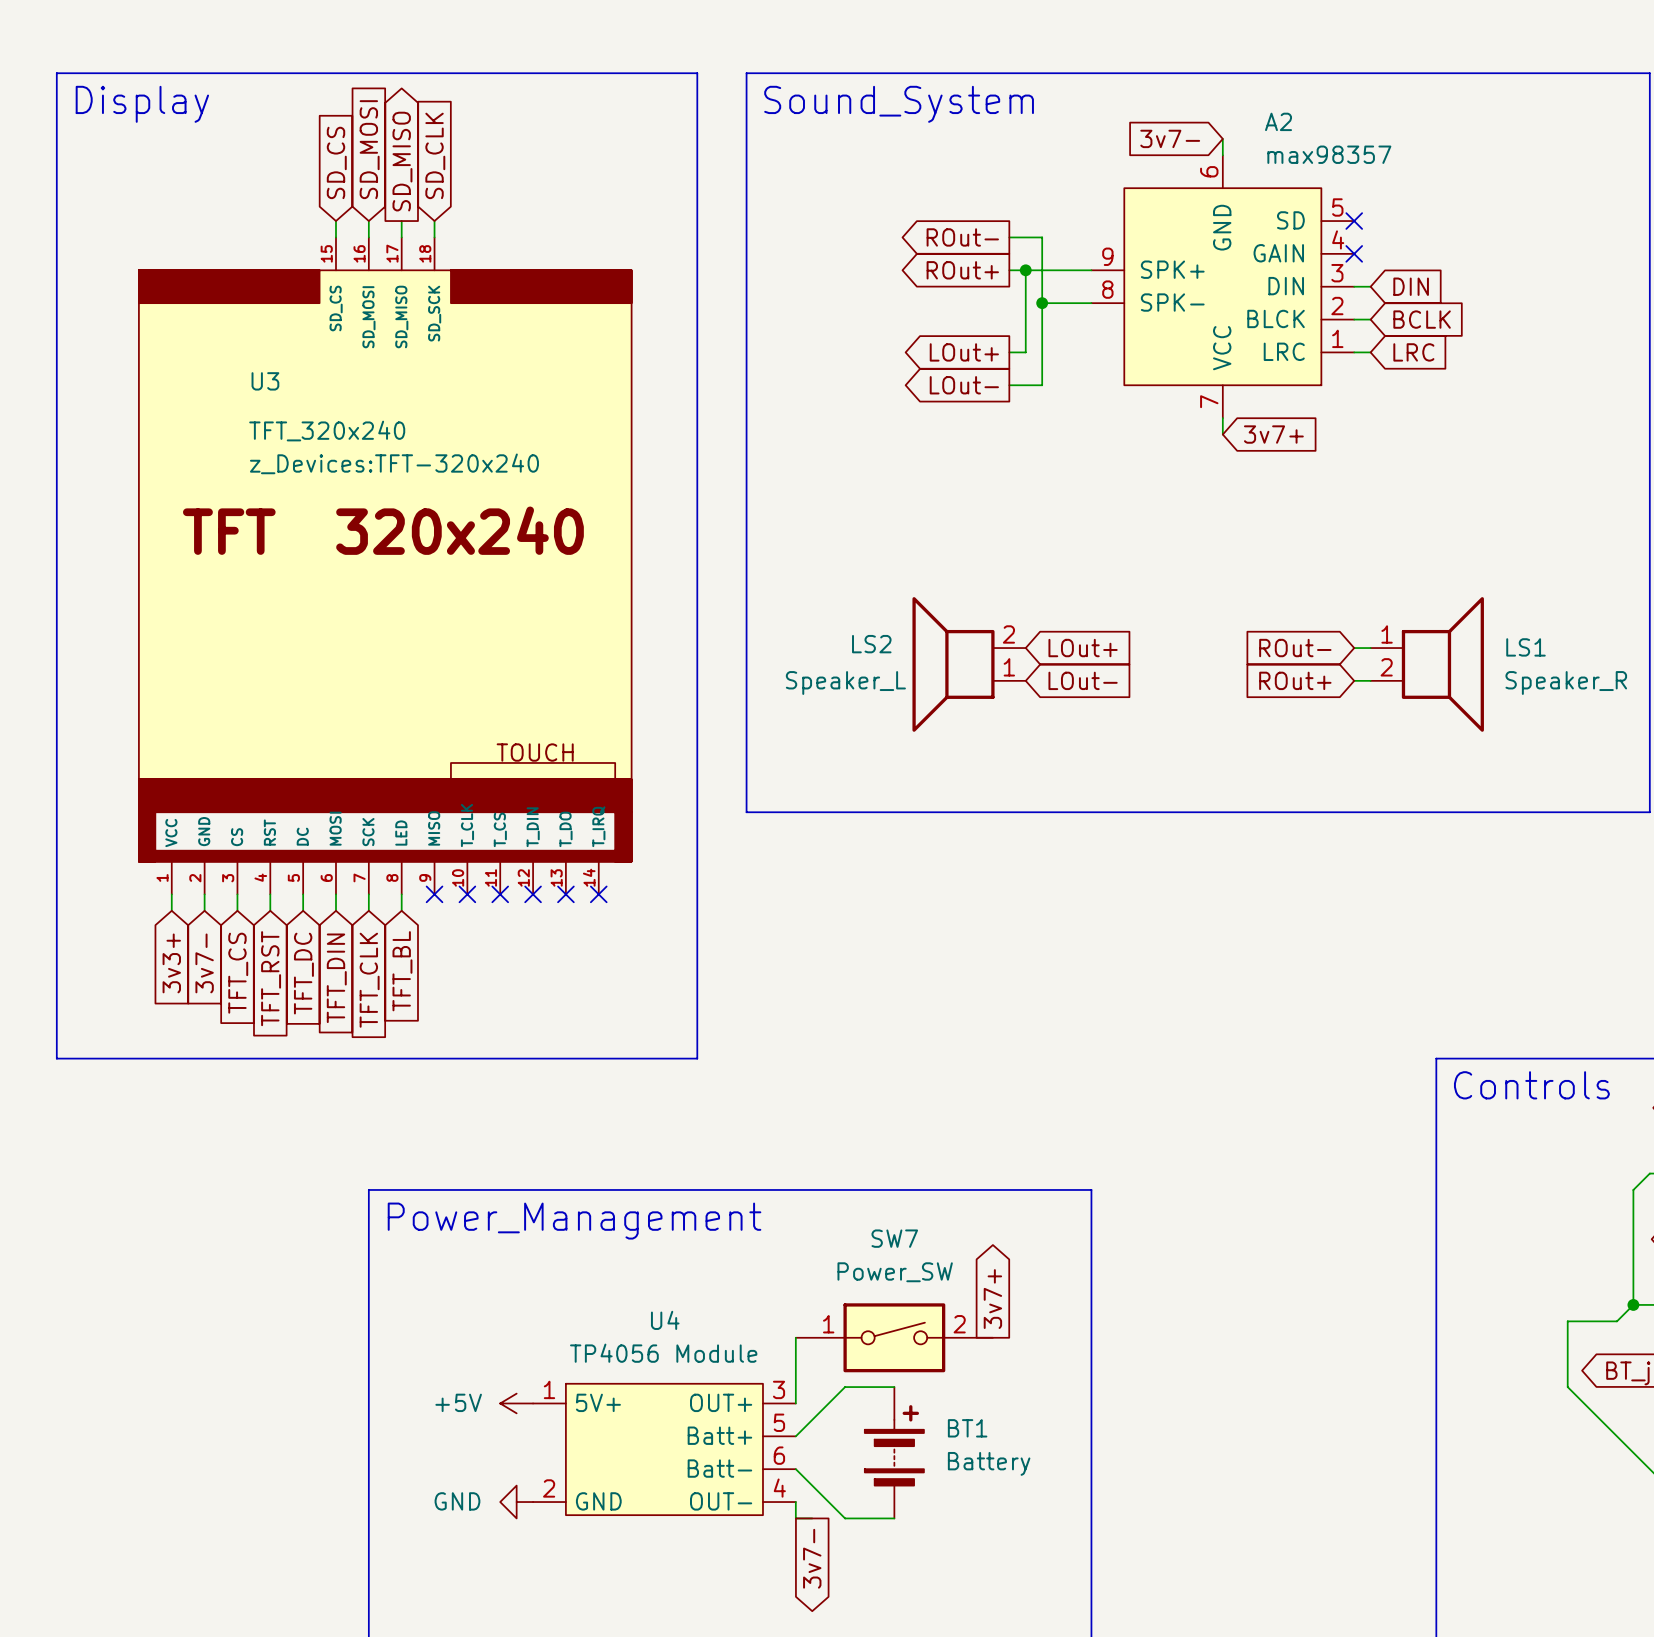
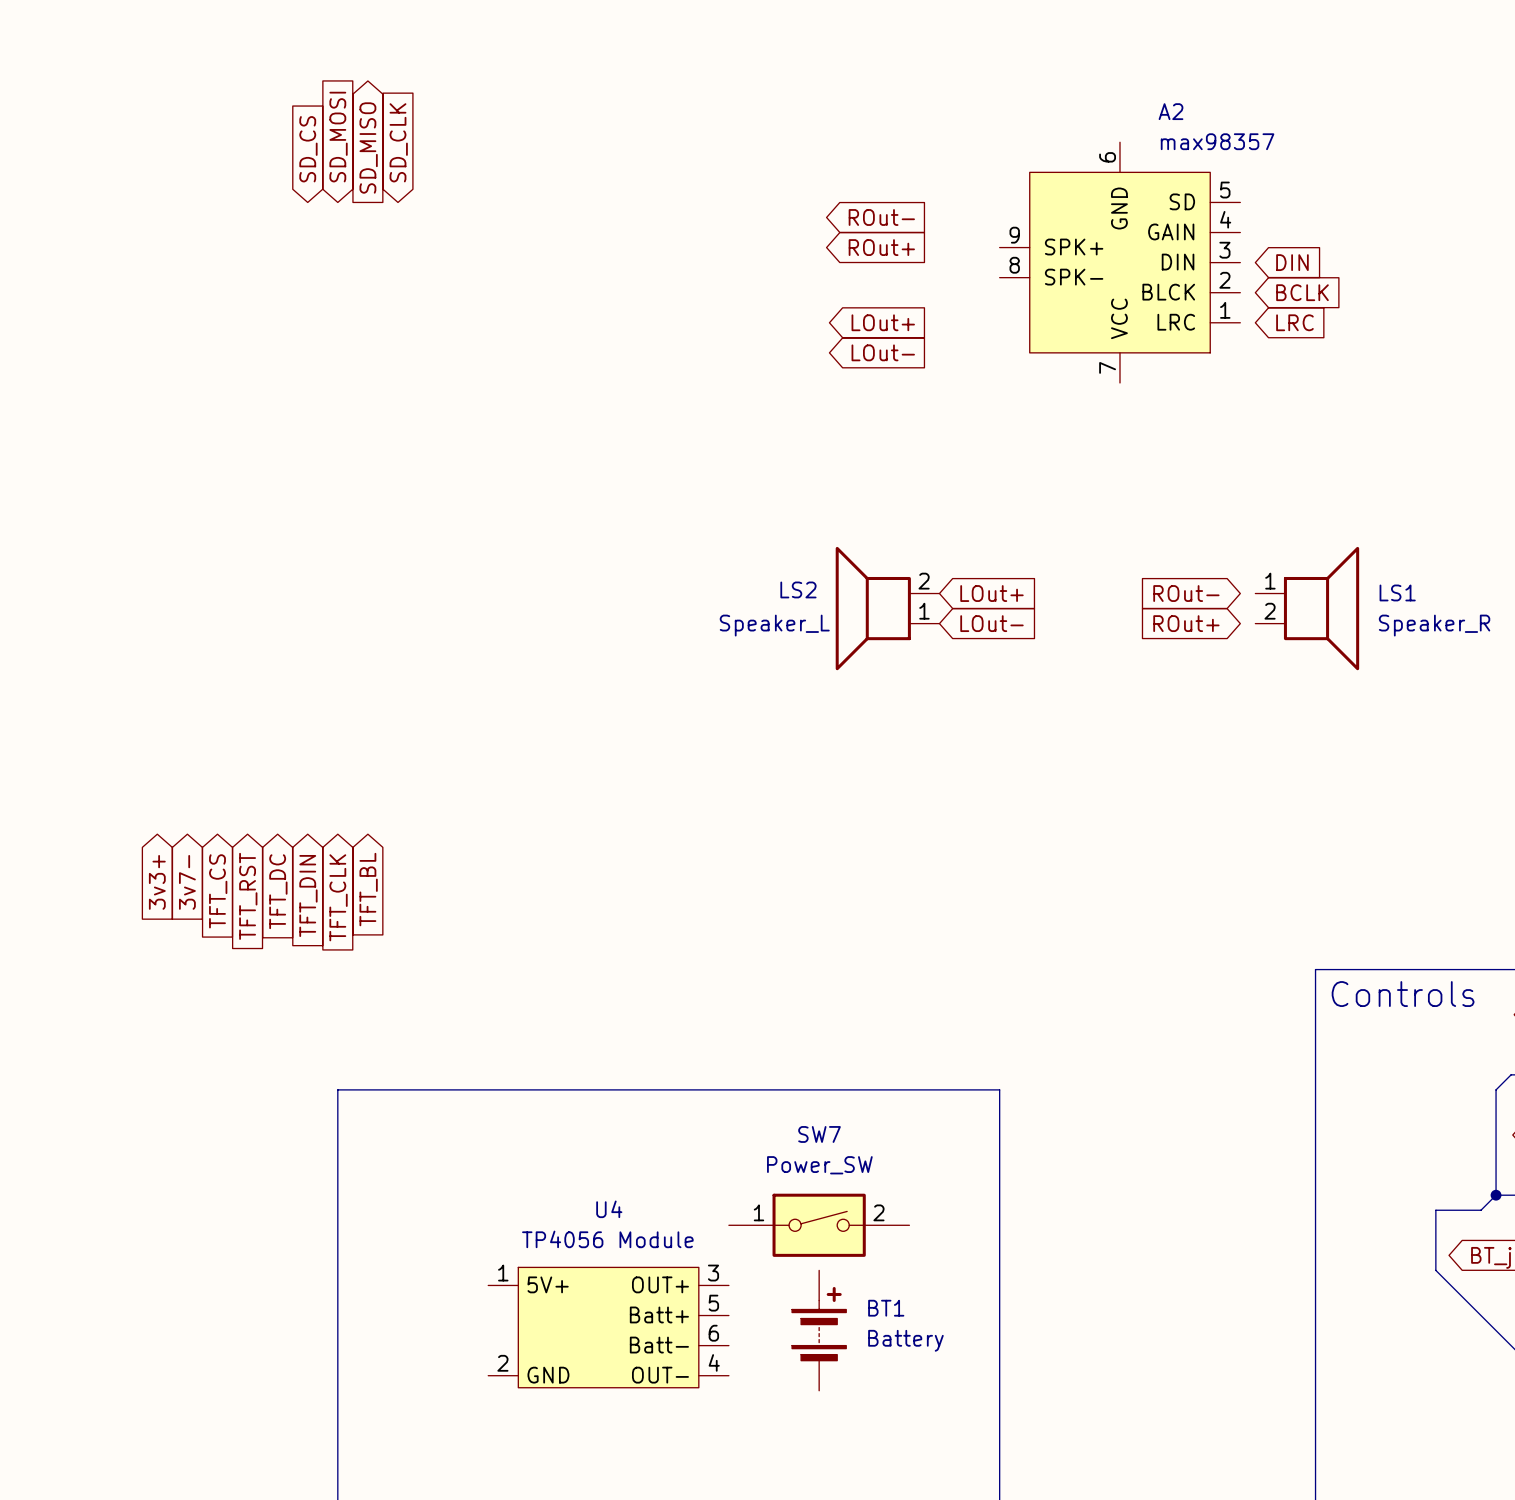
line: (56, 73) (697, 73) (697, 1058) (56, 1058) (56, 73) -> none
line: (746, 73) (1649, 73) (1649, 812) (746, 812) (746, 73) -> none
text: Display (142, 104) -> none
text: Sound_System (899, 104) -> none
global label: 3v7- (1170, 138) -> none
wire: (1222, 138) (1222, 155) -> none
wire: (335, 221) (335, 237) -> none
wire: (368, 221) (368, 237) -> none
wire: (401, 221) (401, 237) -> none
wire: (434, 221) (434, 237) -> none
no-connect mark: (1354, 221) -> none
wire: (1009, 237) (1042, 237) (1042, 385) (1009, 385) -> none
no-connect mark: (1354, 253) -> none
wire: (1009, 270) (1091, 270) -> none
wire: (1025, 270) (1025, 352) (1009, 352) -> none
junction: (1025, 270) -> none
wire: (1354, 286) (1370, 286) -> none
wire: (1042, 303) (1091, 303) -> none
junction: (1042, 303) -> none
wire: (1354, 319) (1370, 319) -> none
wire: (1354, 352) (1370, 352) -> none
wire: (1222, 418) (1222, 434) -> none
global label: 3v7+ (1273, 434) -> none
U3: TFT_320x240 (385, 565) -> none
wire: (1354, 648) (1370, 648) -> none
wire: (1354, 680) (1370, 680) -> none
wire: (171, 894) (171, 910) -> none
wire: (204, 894) (204, 910) -> none
wire: (237, 894) (237, 910) -> none
wire: (270, 894) (270, 910) -> none
wire: (303, 894) (303, 910) -> none
wire: (335, 894) (335, 910) -> none
wire: (368, 894) (368, 910) -> none
wire: (401, 894) (401, 910) -> none
no-connect mark: (434, 894) -> none
no-connect mark: (467, 894) -> none
no-connect mark: (500, 894) -> none
no-connect mark: (533, 894) -> none
no-connect mark: (565, 894) -> none
no-connect mark: (598, 894) -> none
text: Power_Management (574, 1221) -> none
global label: 3v7+ (992, 1299) -> none
wire: (795, 1337) (795, 1403) -> none
wire: (894, 1387) (845, 1387) (795, 1436) -> none
power symbol: +5V (516, 1403) -> none
wire: (795, 1469) (845, 1518) (894, 1518) -> none
power symbol: GND (516, 1502) -> none
wire: (795, 1502) (795, 1518) (812, 1518) -> none
global label: 3v7- (812, 1558) -> none

